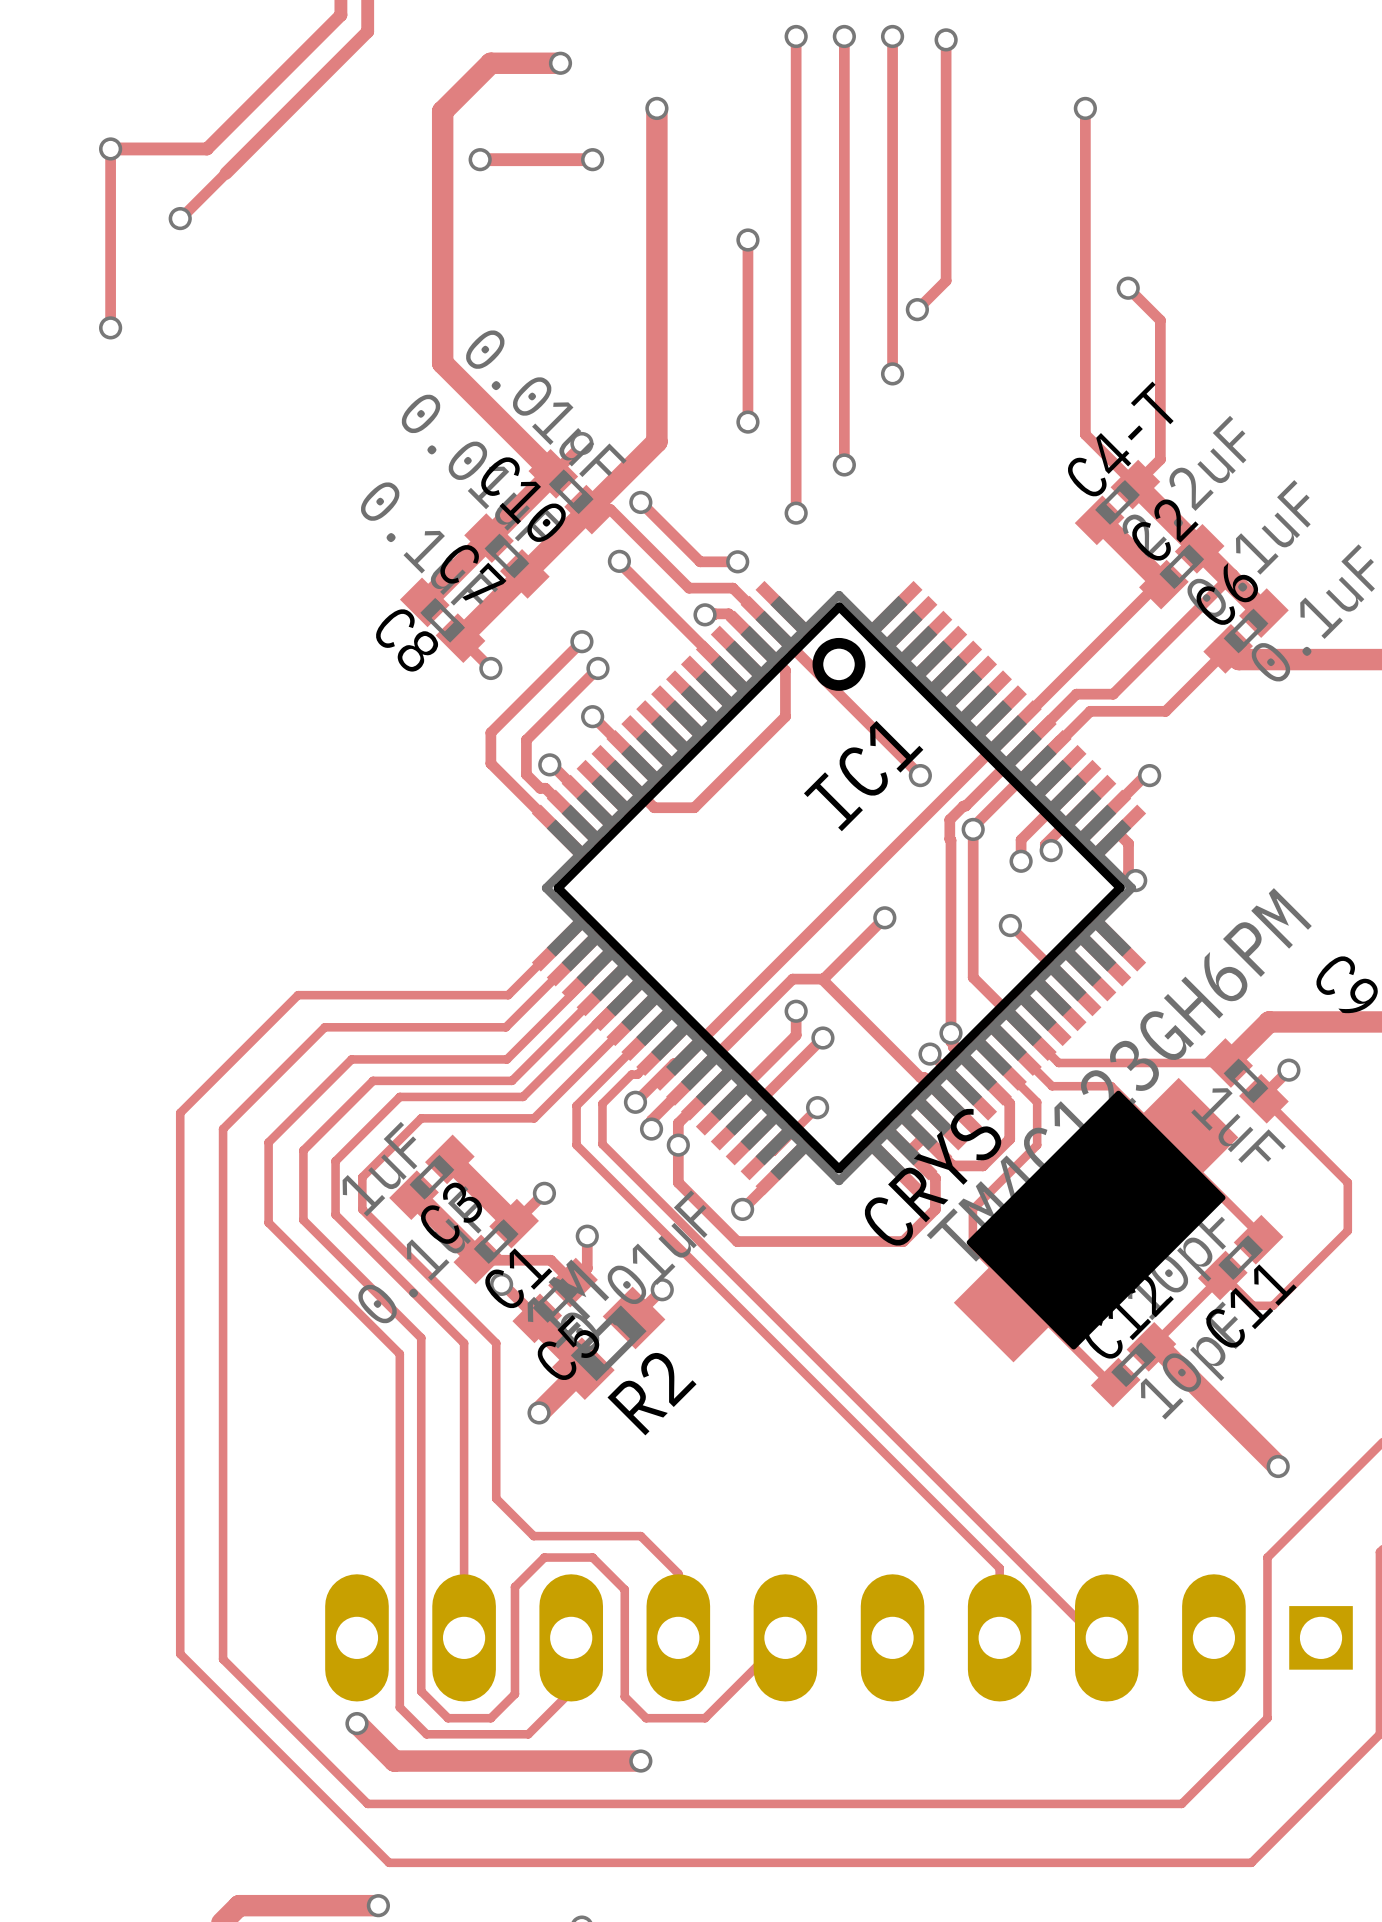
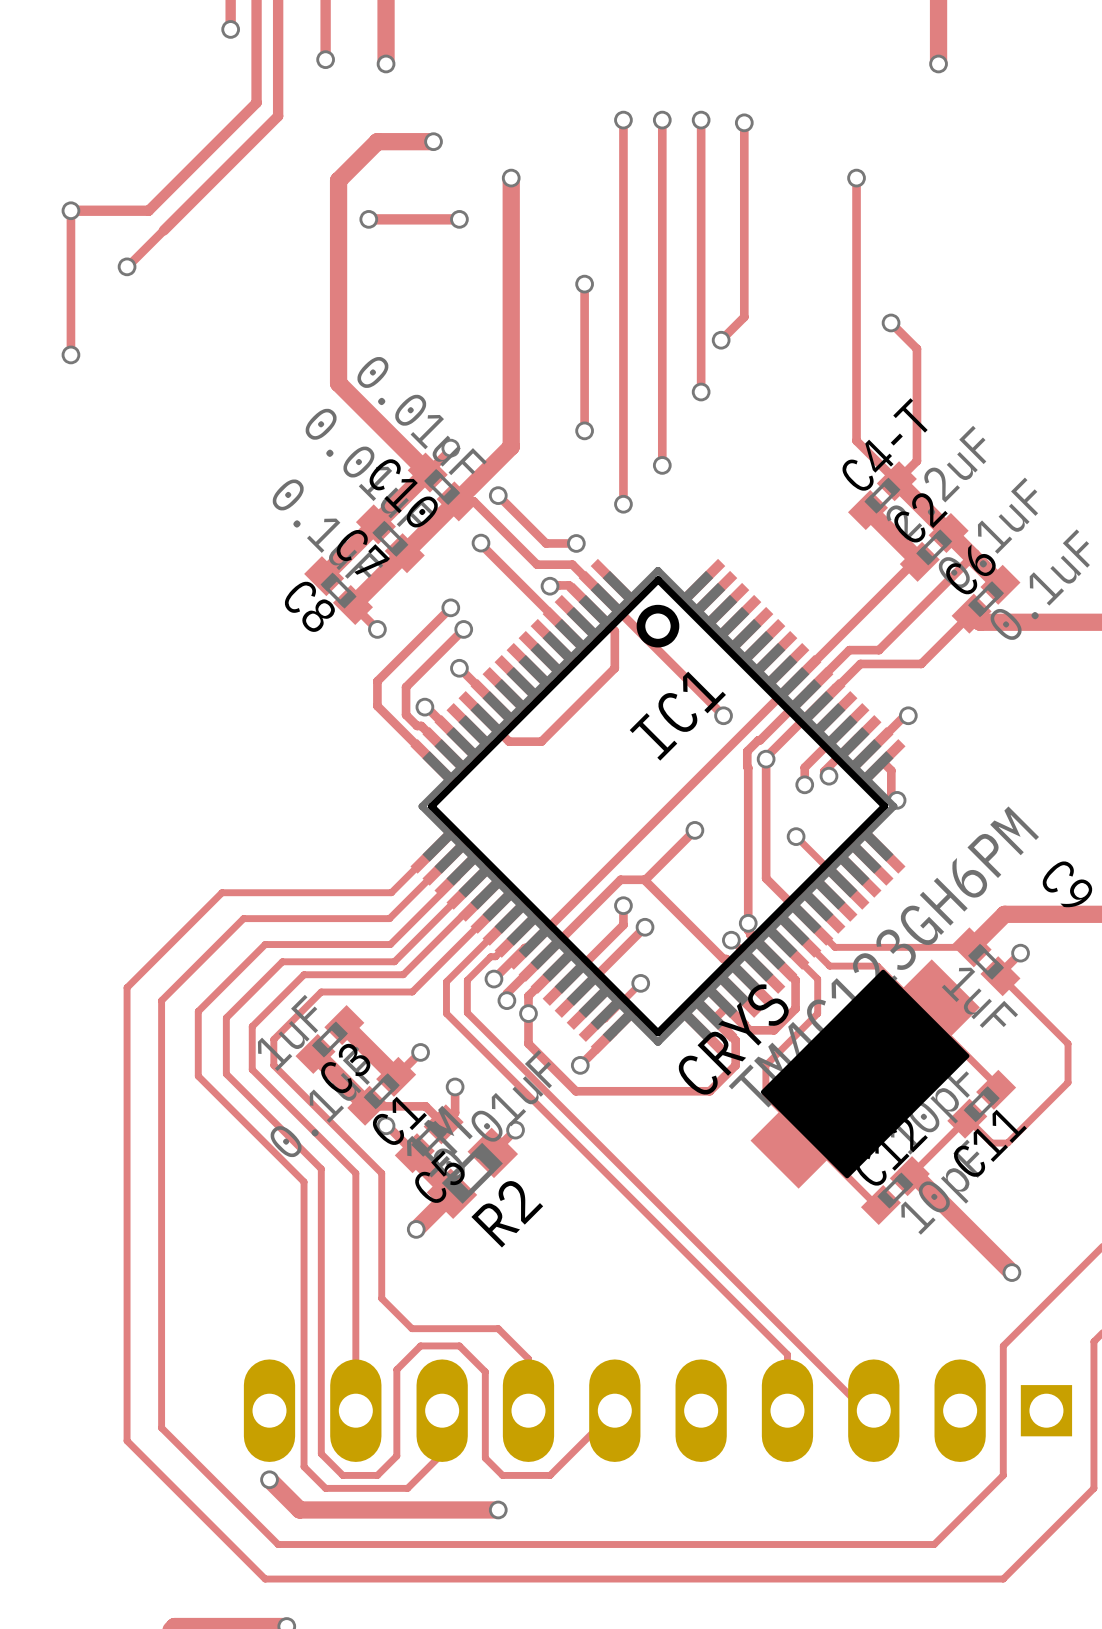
track: (180, 1653) (389, 1862) (1251, 1862) (1267, 1846) -> (127, 1423) (127, 1440) (265, 1579) (1003, 1579)

